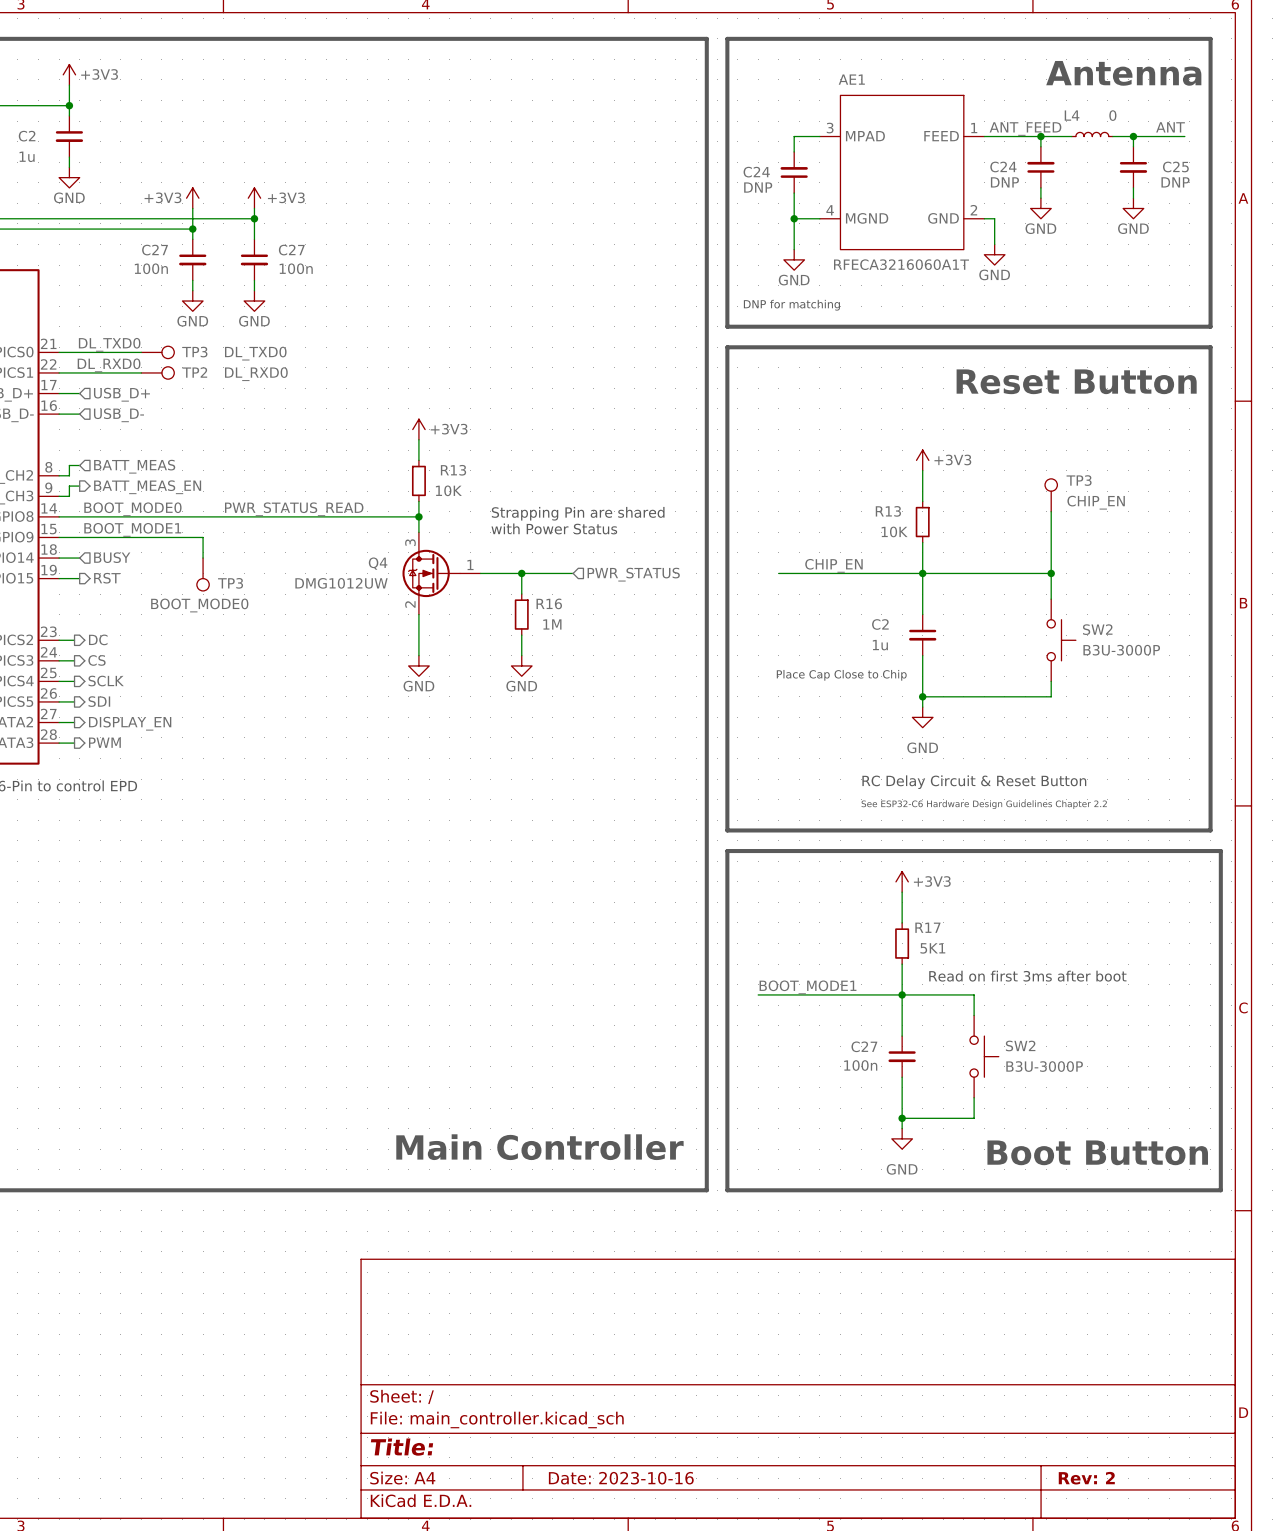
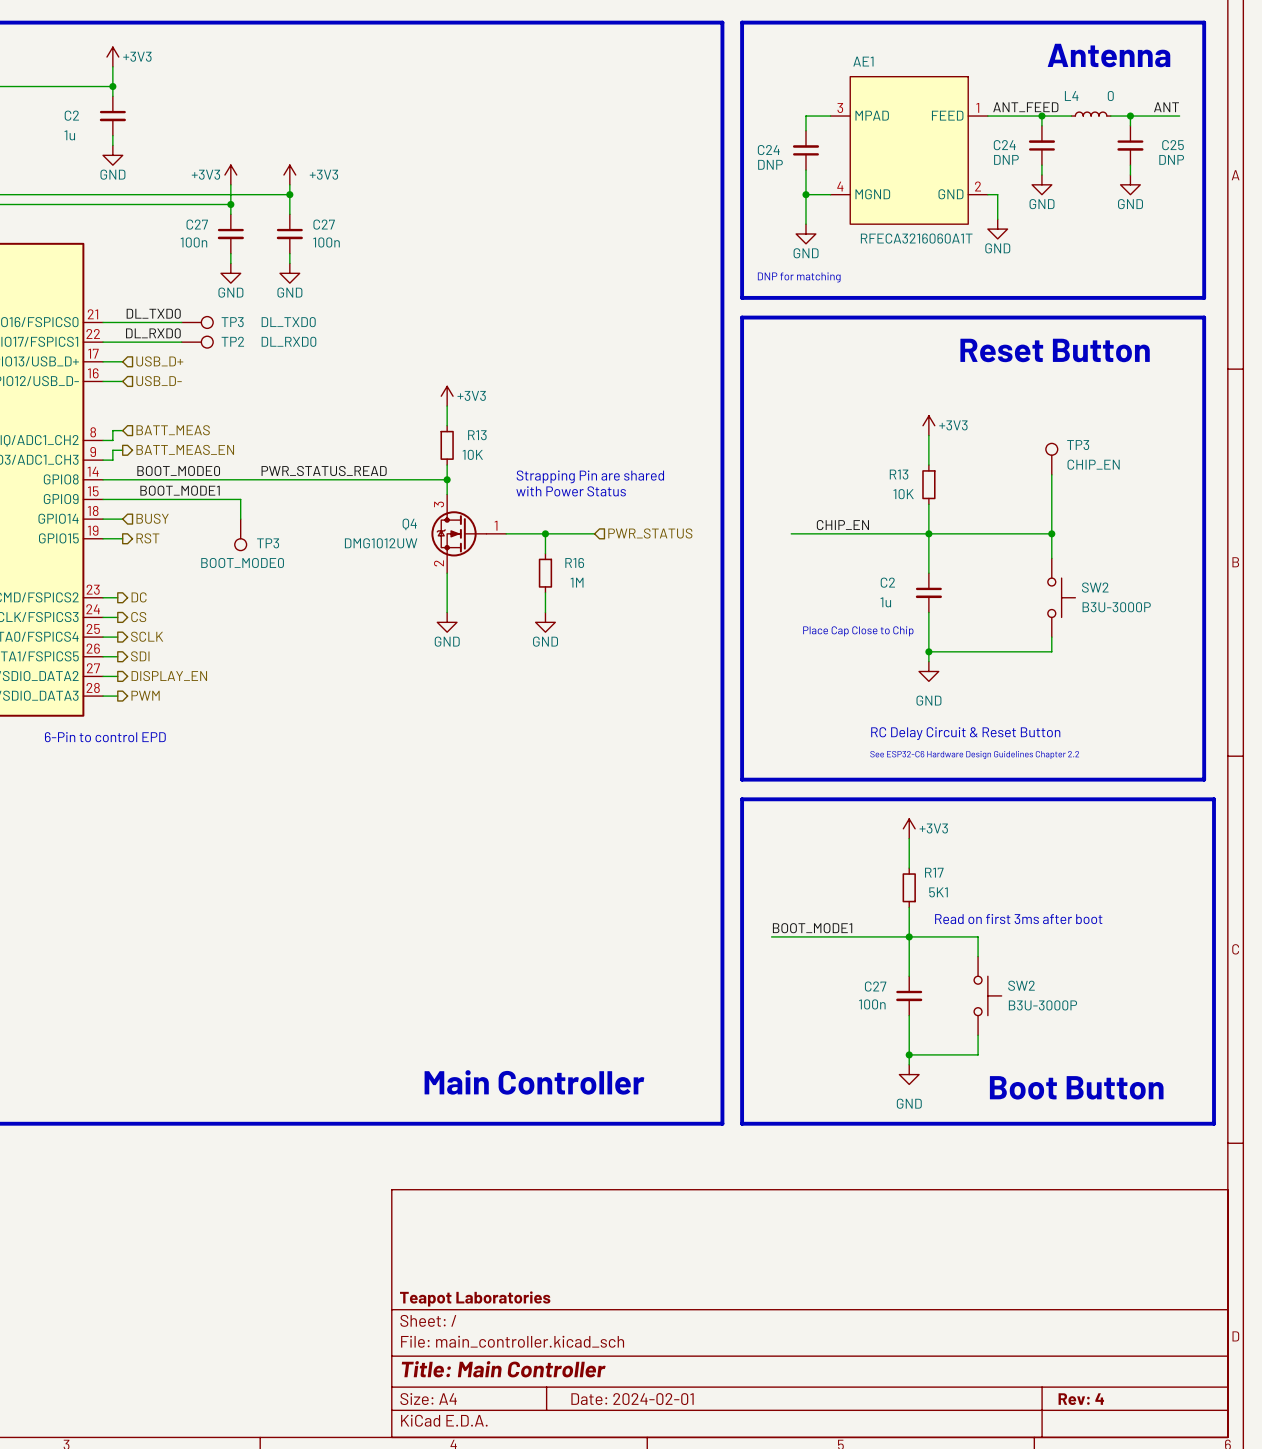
title block: none -> Teapot Laboratories (475, 1298)
title block: Title: (402, 1447) -> Title: Main Controller (503, 1369)
title block: Date: 2023-10-16 (621, 1478) -> Date: 2024-02-01 (632, 1399)
title block: Rev: 2 (1086, 1478) -> Rev: 4 (1081, 1399)

